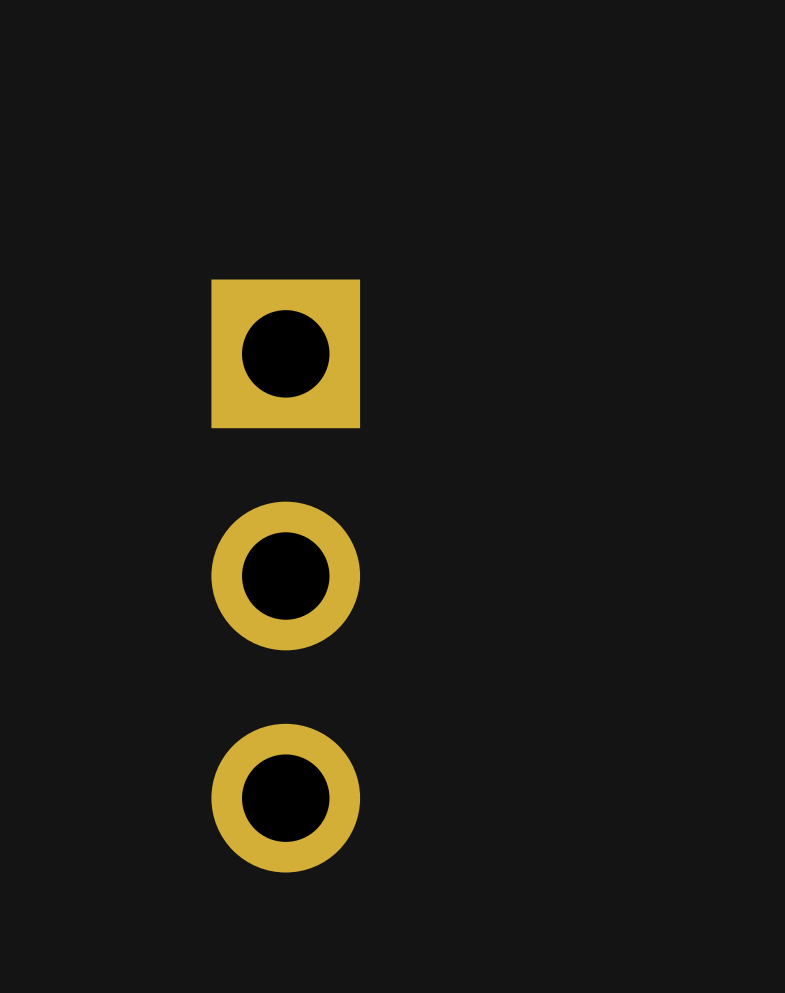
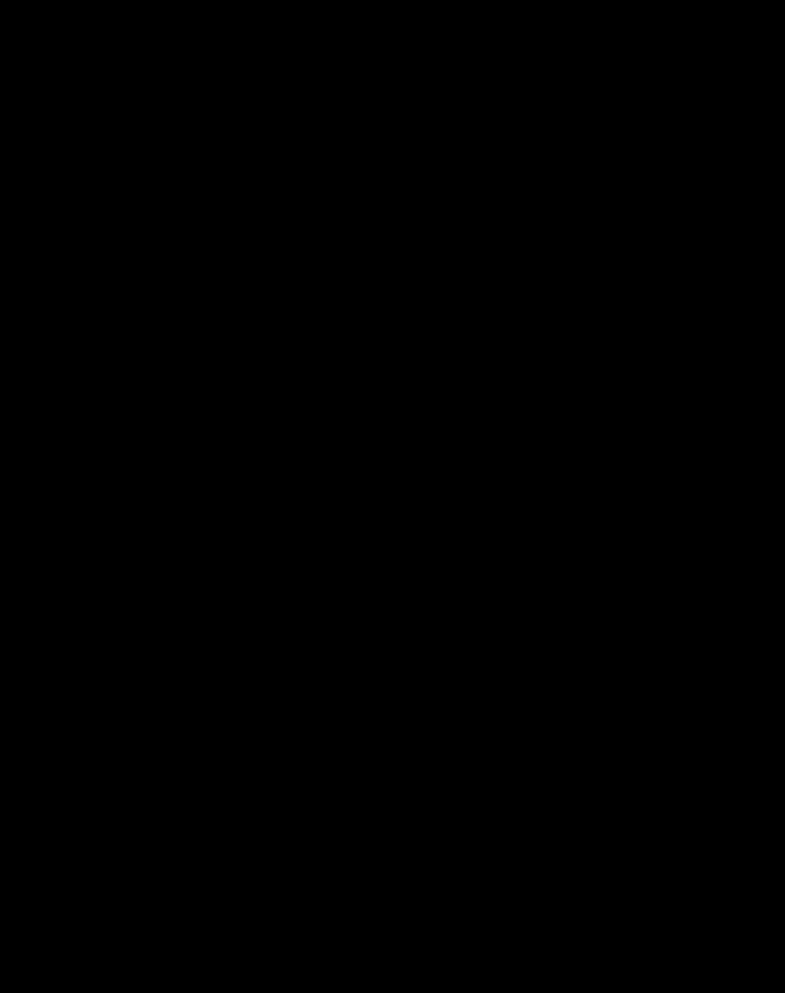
part: (285, 576) -> none

